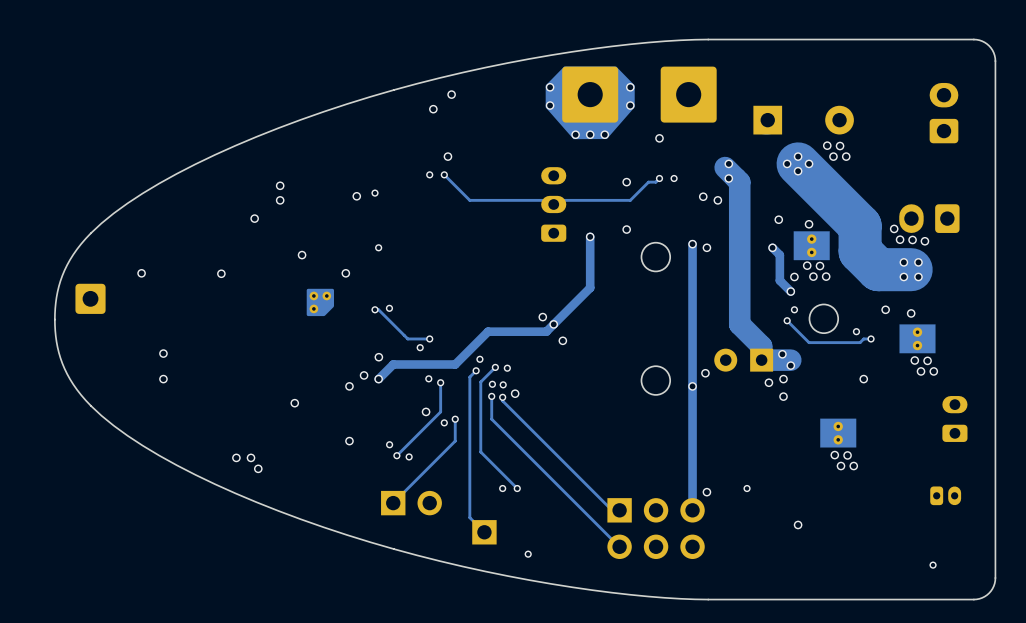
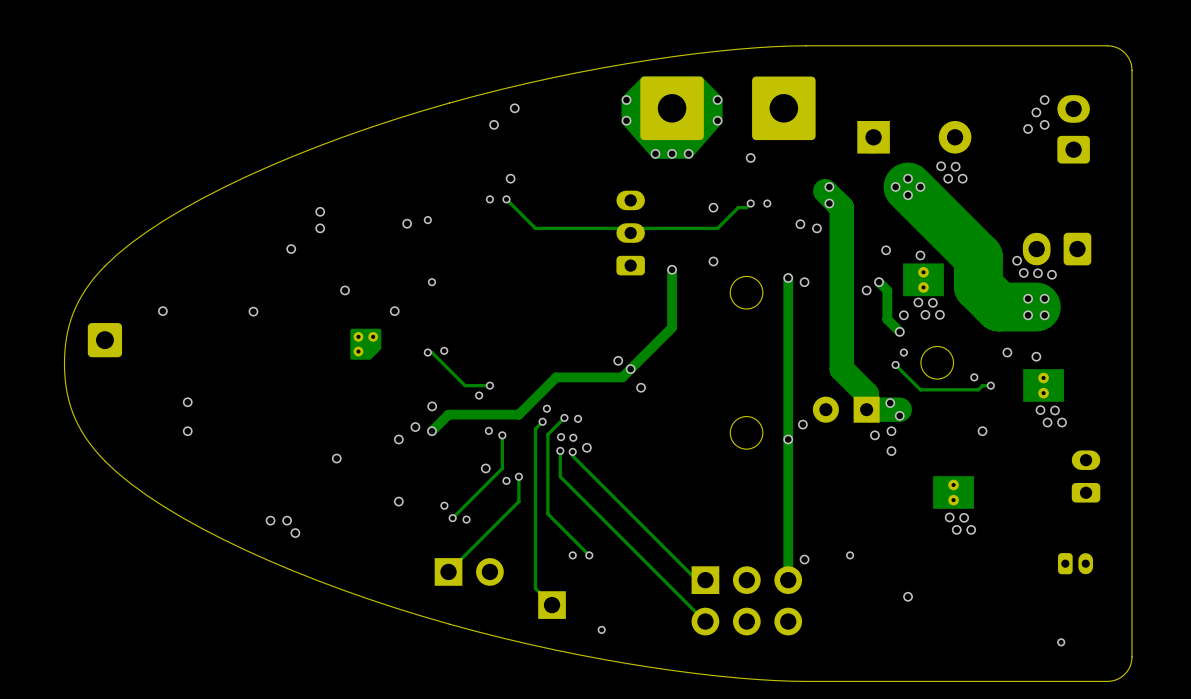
via: none -> (1044, 100)
via: none -> (1036, 112)
via: none -> (1044, 124)
via: none -> (1028, 129)
via: none -> (866, 290)

